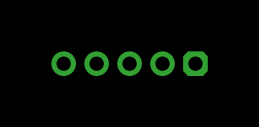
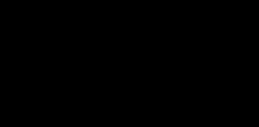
part: (129, 63) -> none

